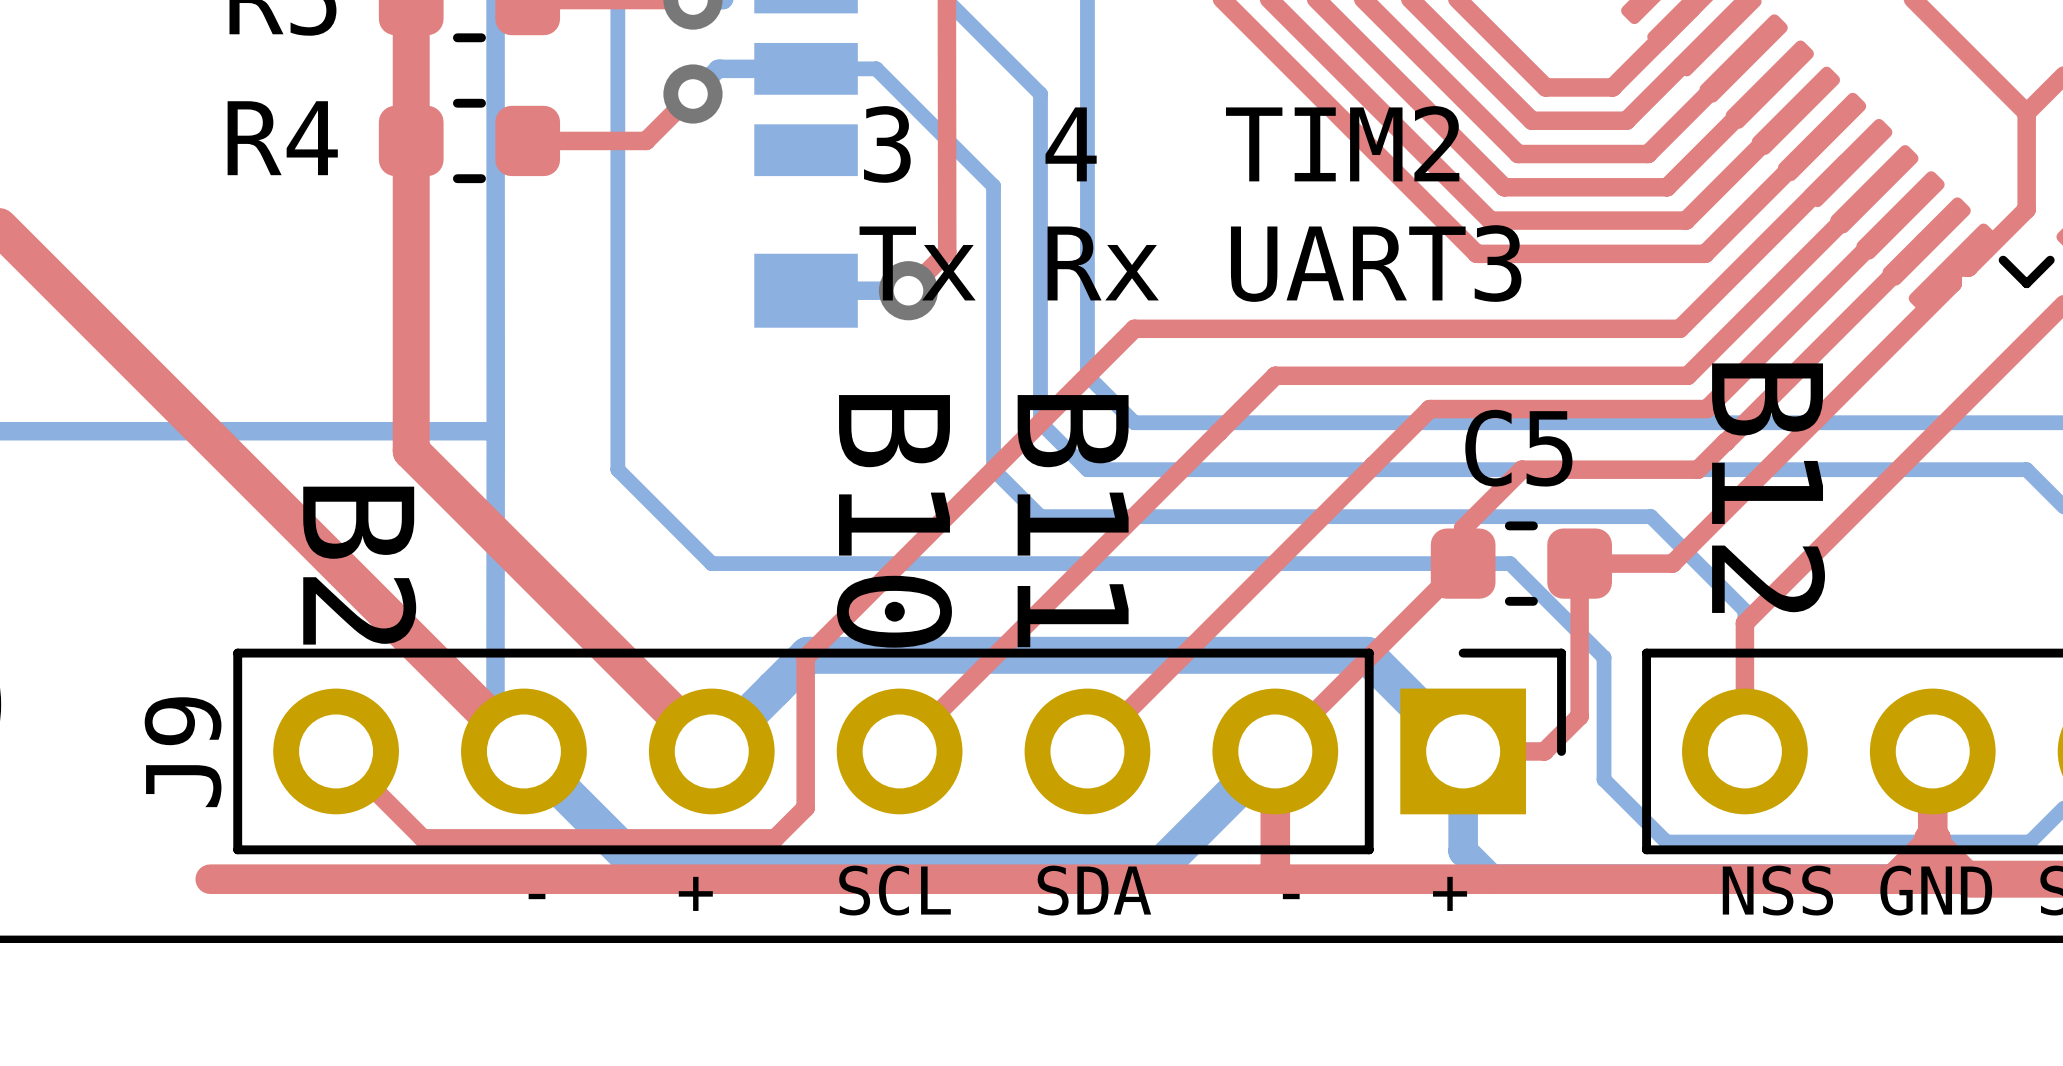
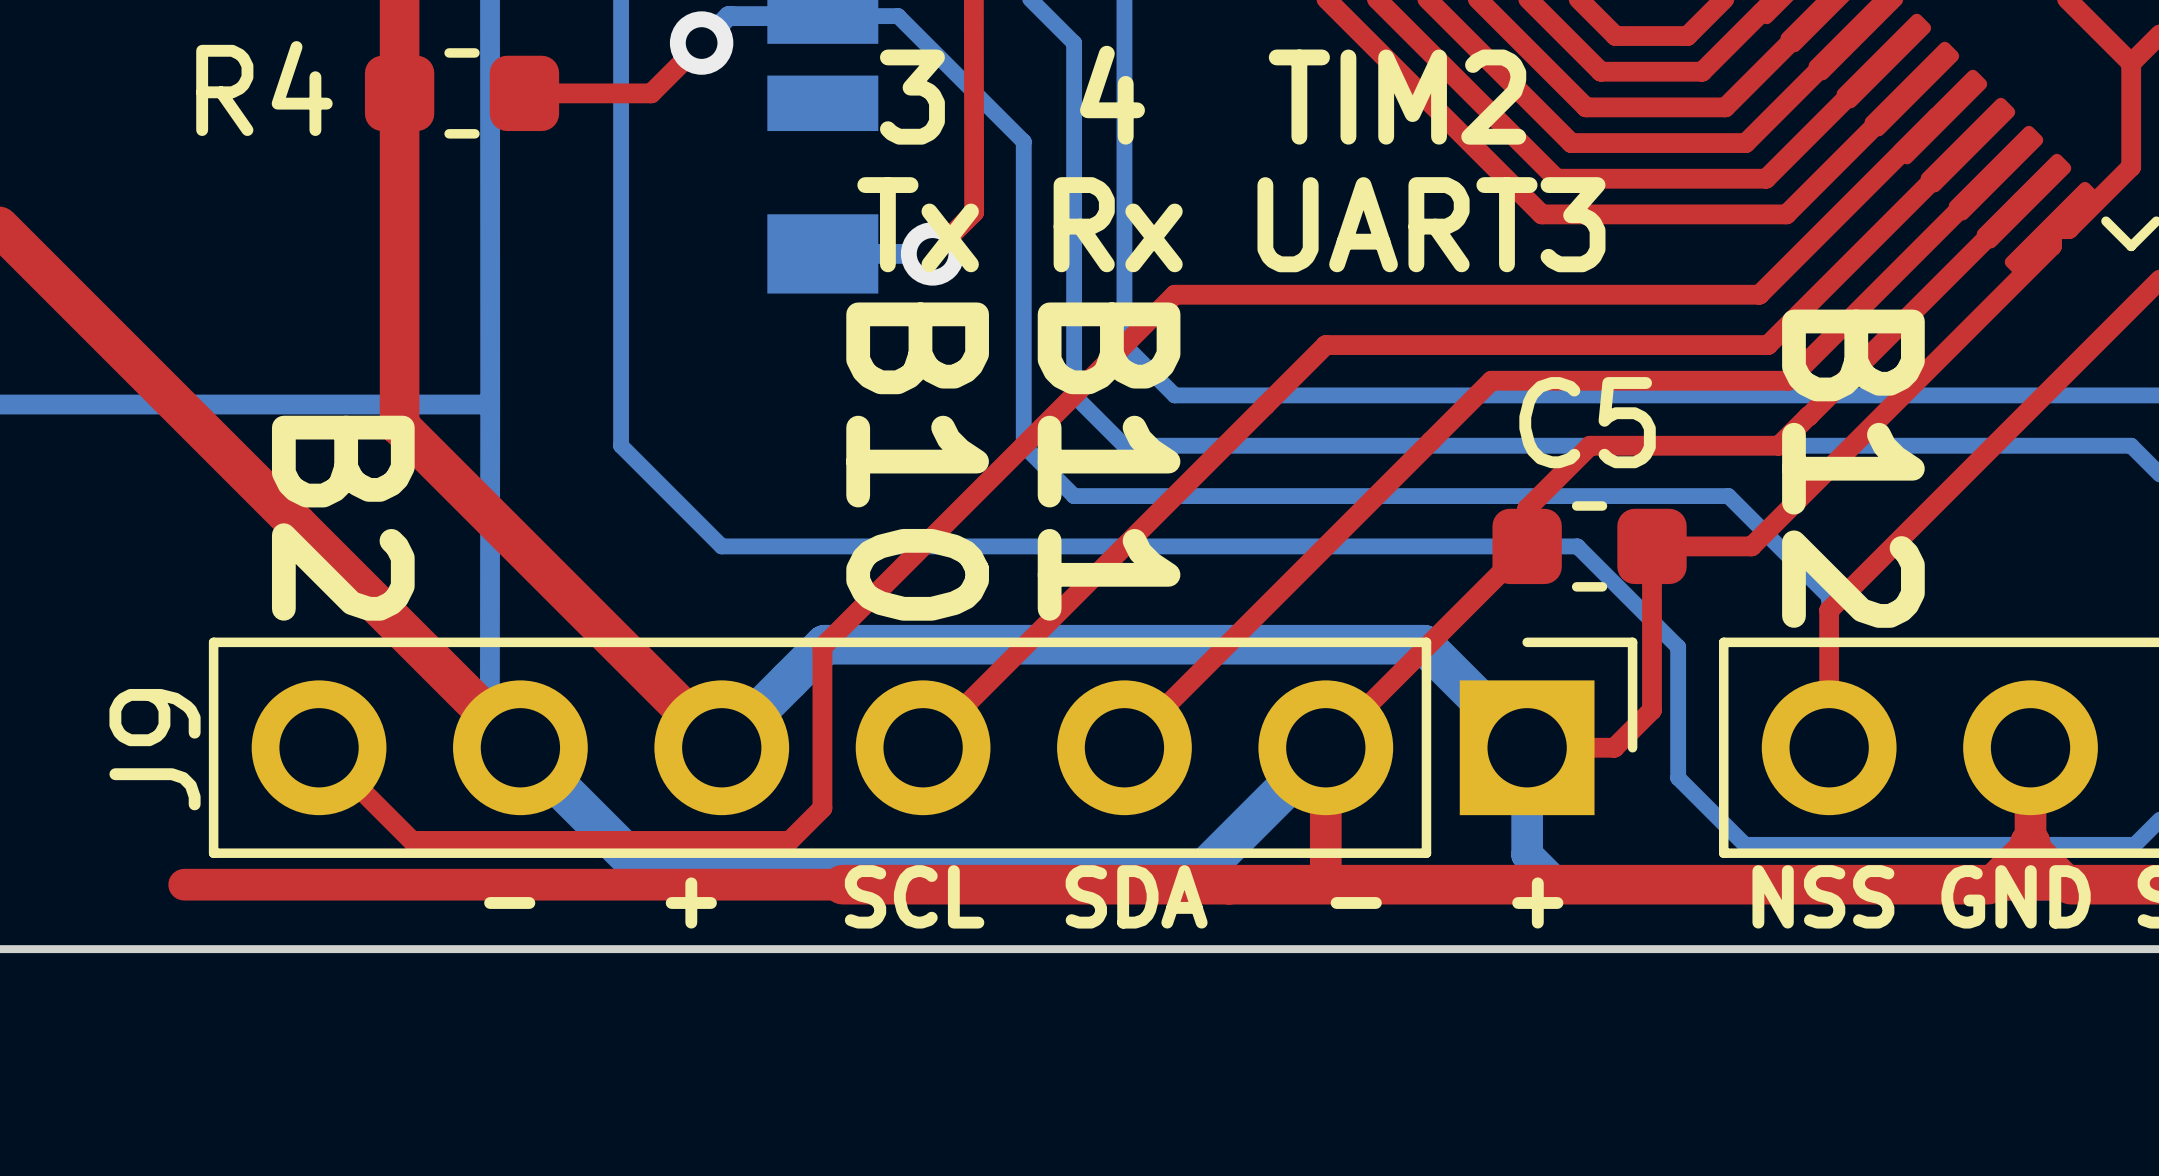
top track width: thin (824, 879) (1893, 879) -> thick (842, 884) (1988, 884)

